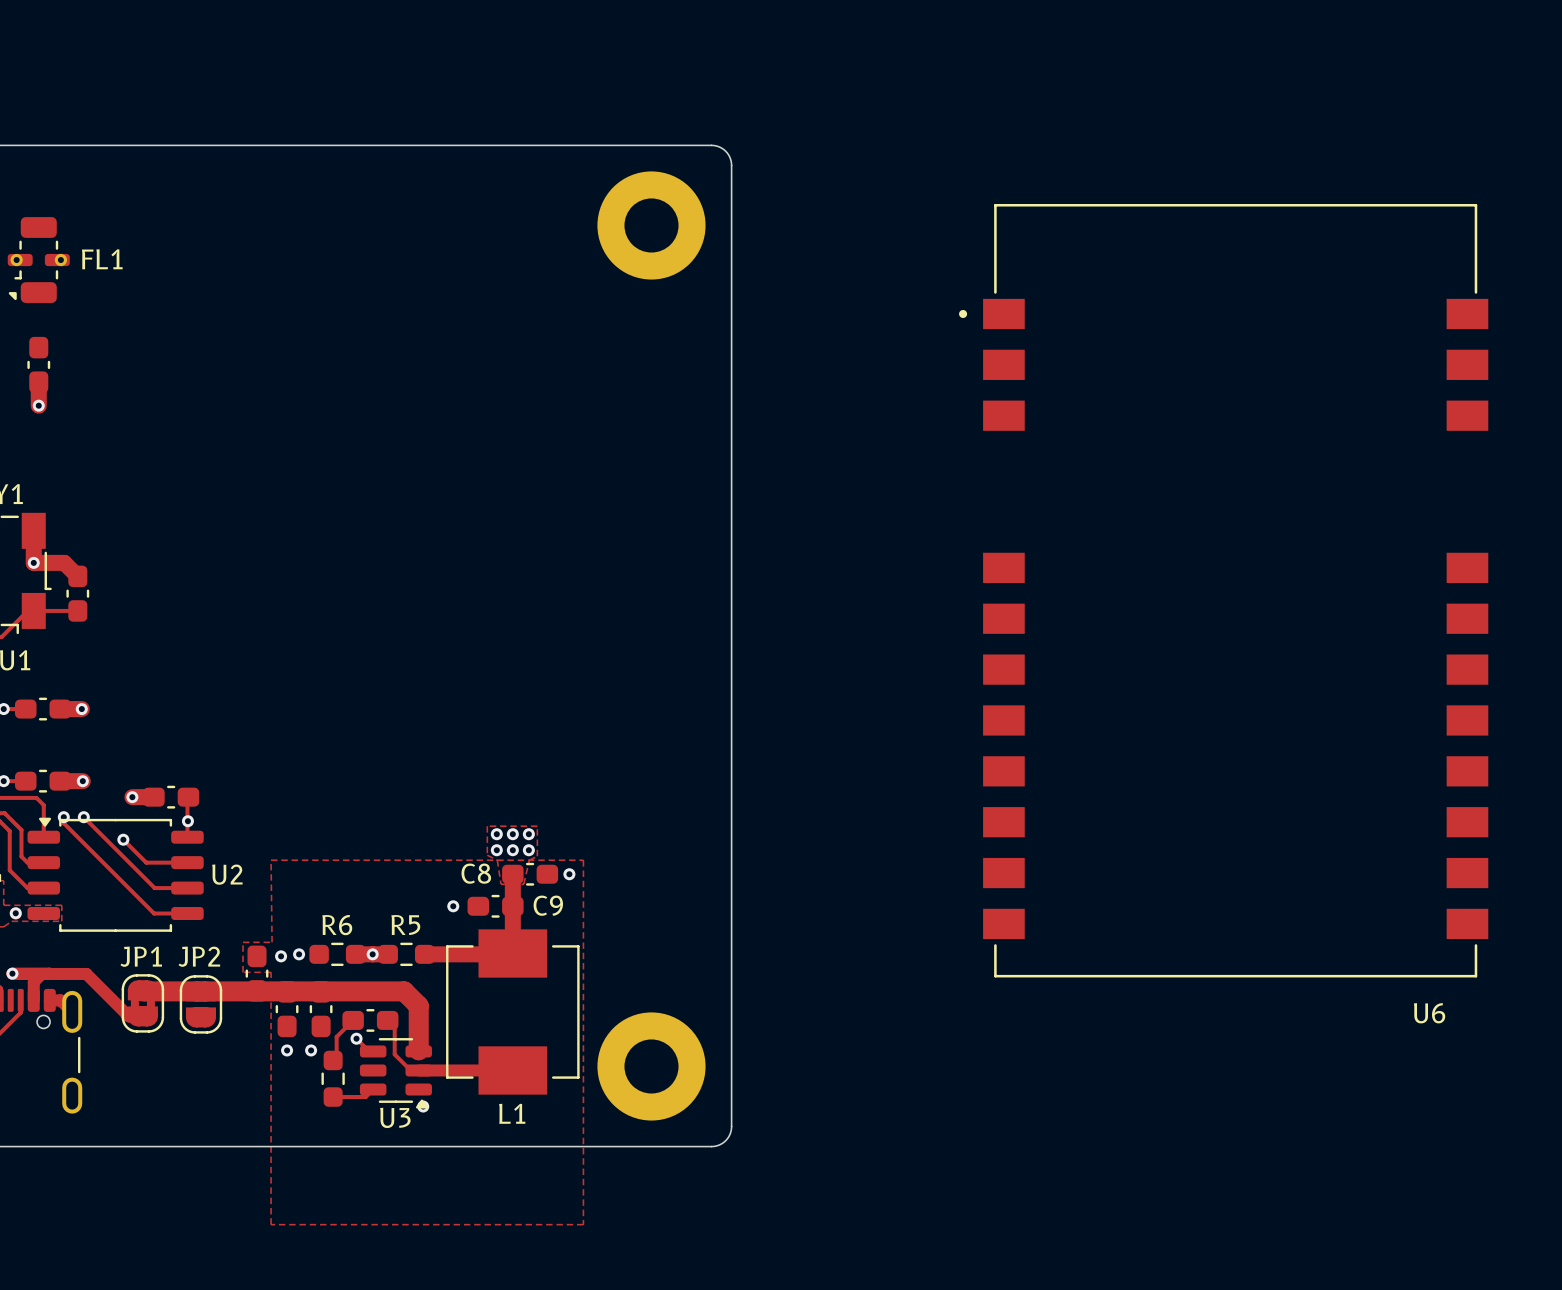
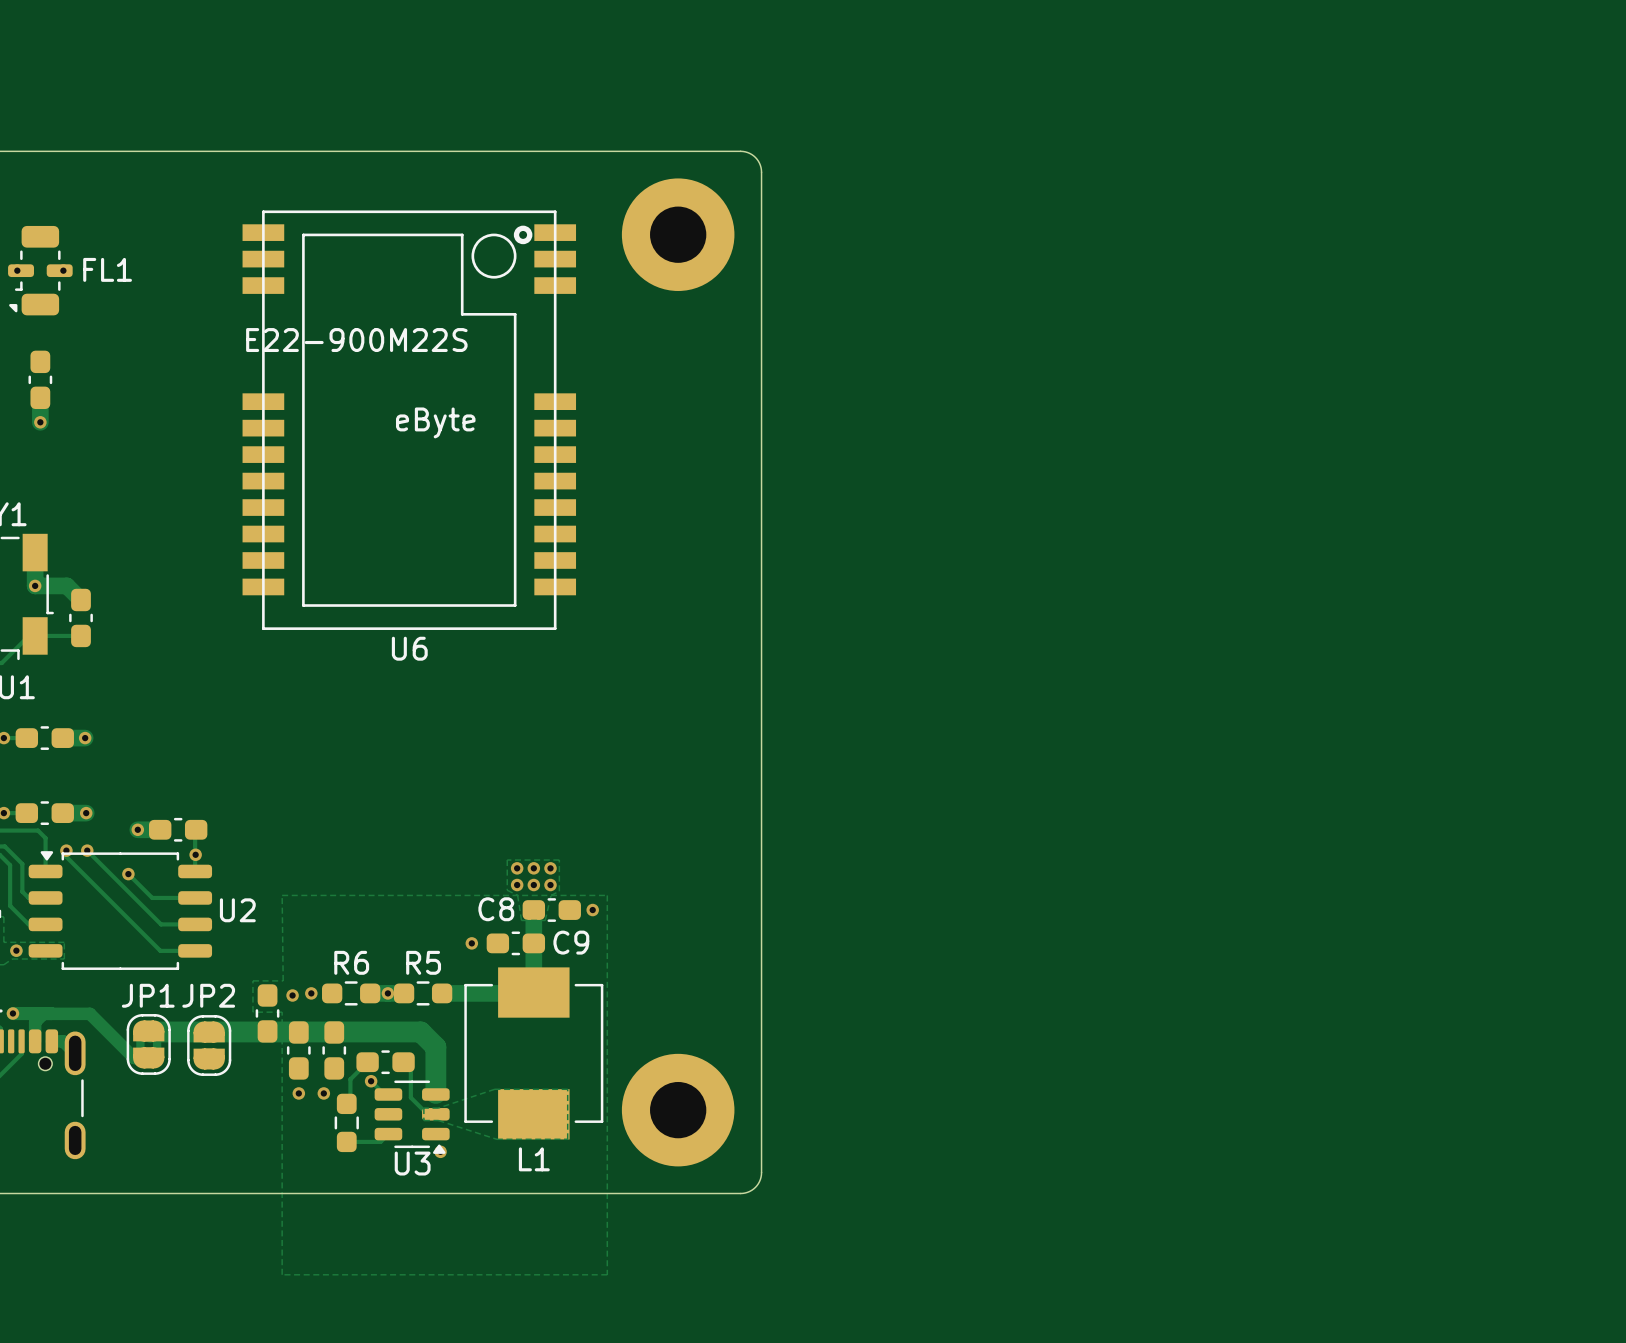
U6 footprint: [959, 203, 1489, 978] -> [242, 210, 577, 630]
U6 name position: U6 (1429, 1013) -> U6 (409, 648)
zone outline: none -> (494, 1089) (567, 1089) (567, 1139) (496, 1139) (438, 1120) (423, 1120) (423, 1108) (438, 1108) (494, 1089)
track: (418, 1070) (512, 1070) -> none

